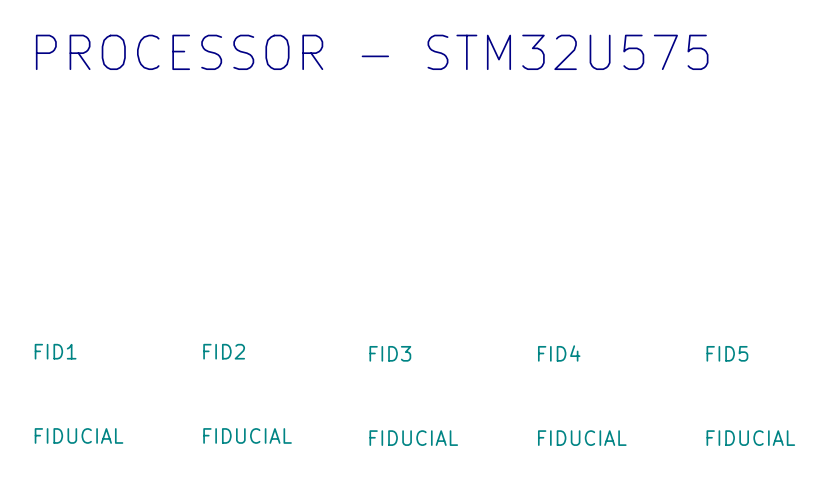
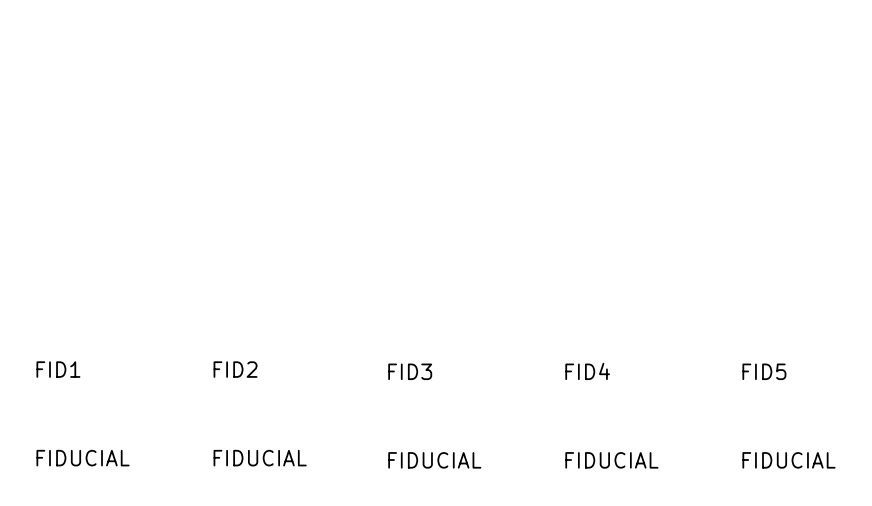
text: PROCESSOR - STM32U575 (372, 52) -> none

